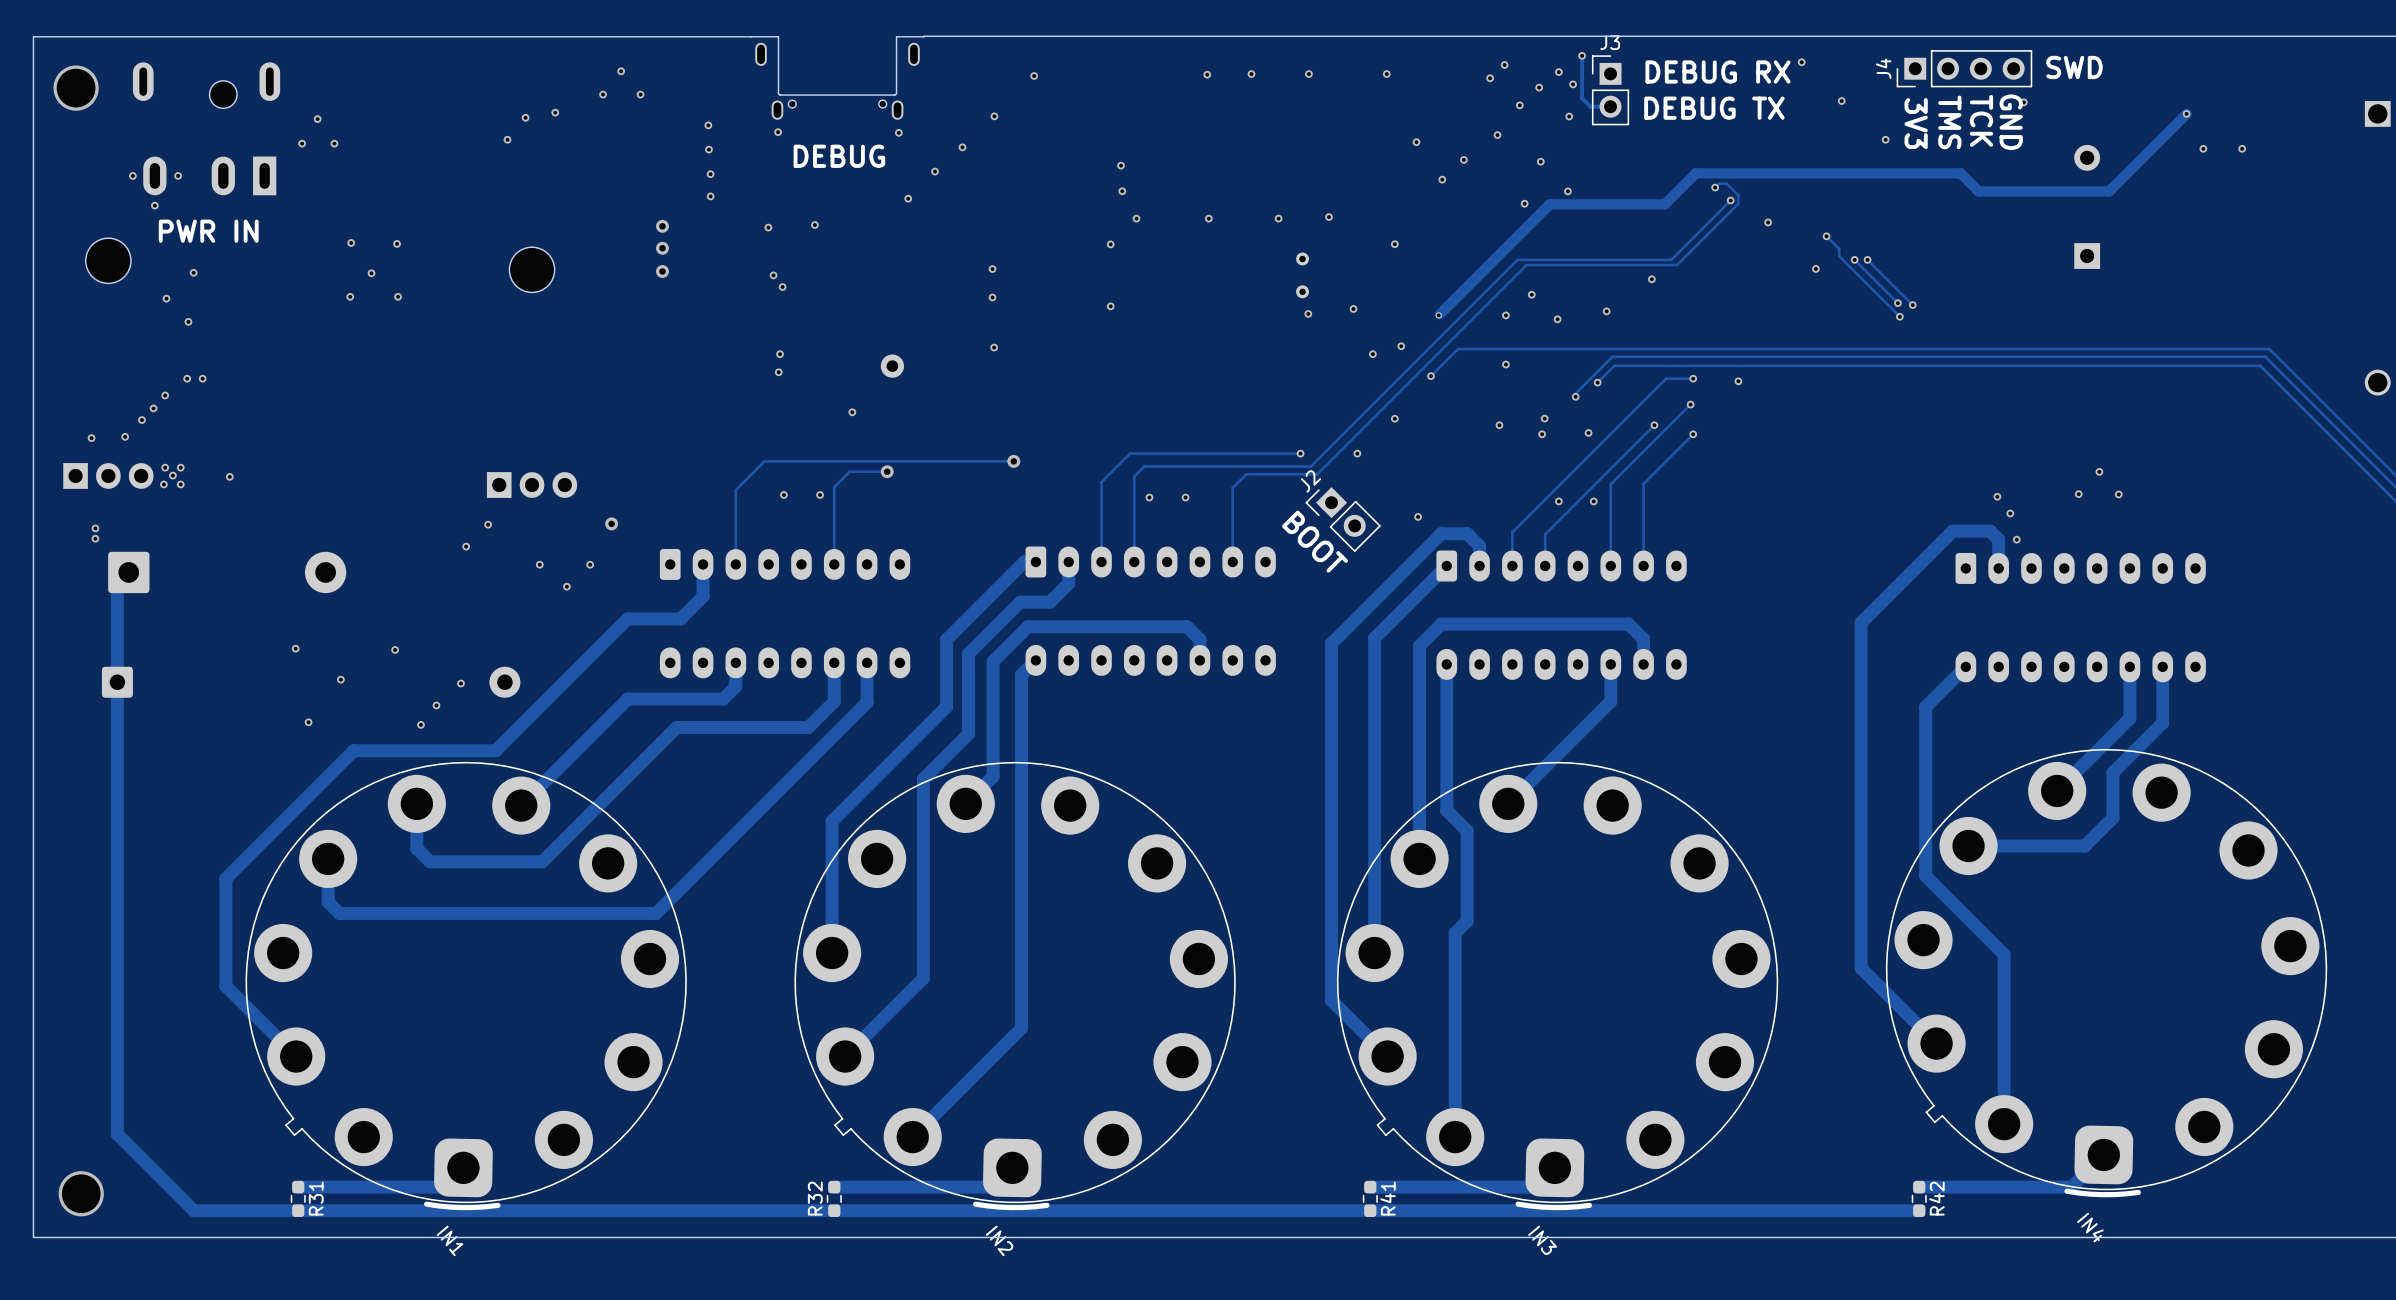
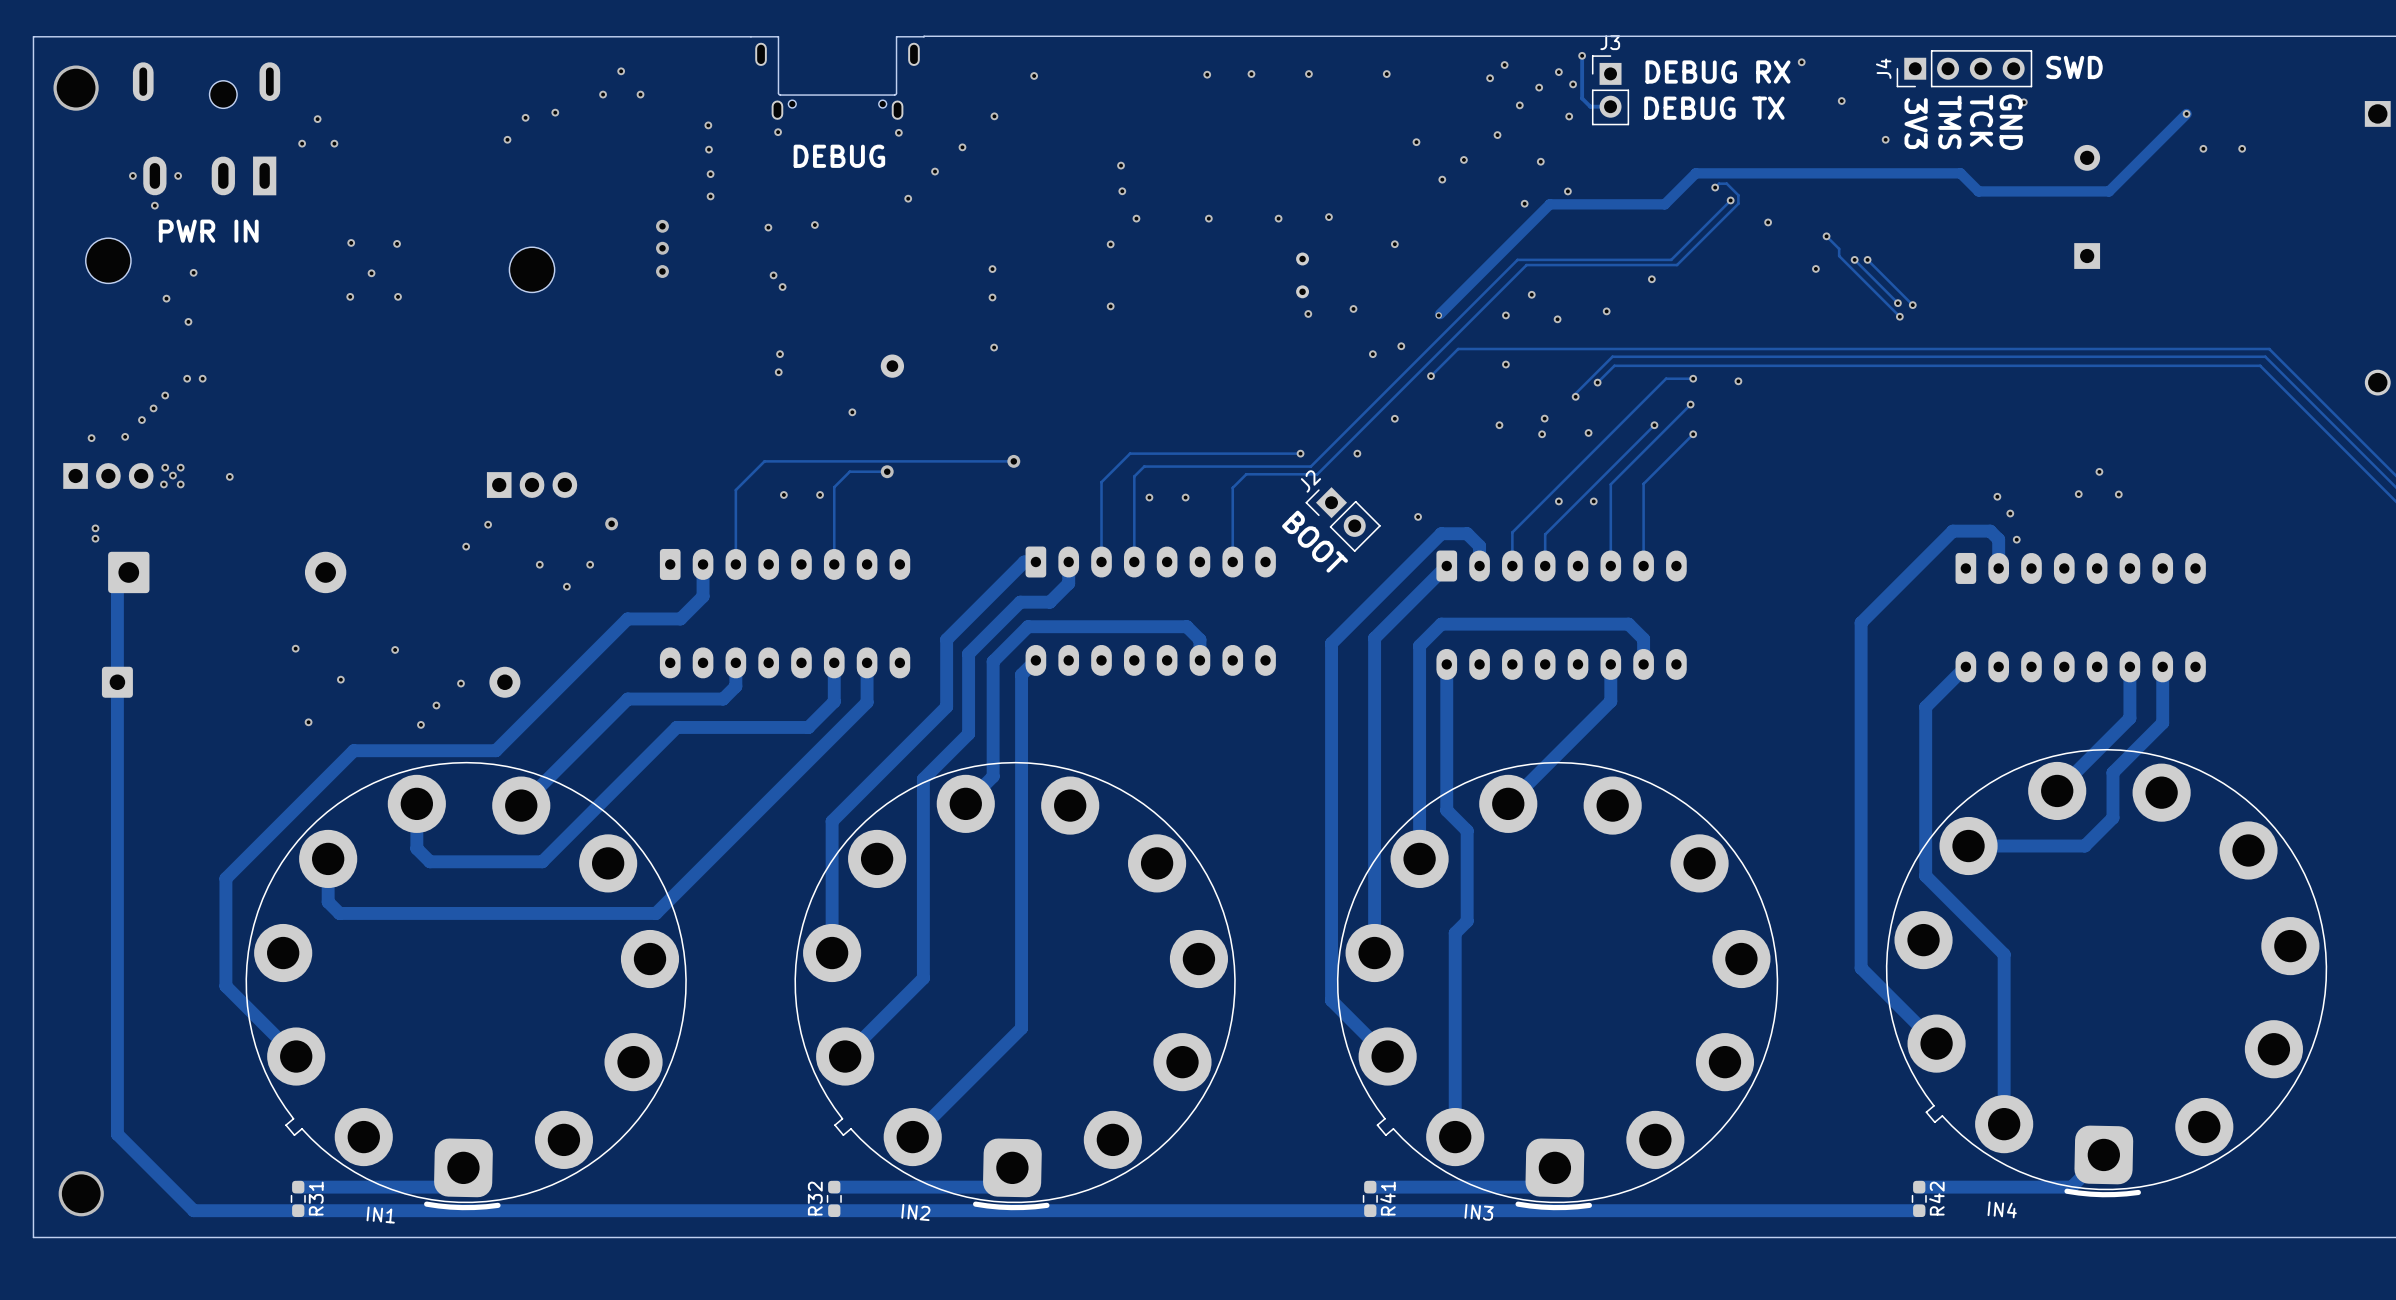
IN4 name rotation: 0° (2090, 1227) -> 45° counterclockwise (2002, 1209)
IN4 name position: IN4 (2090, 1227) -> IN4 (2002, 1209)
IN1 name rotation: 0° (450, 1240) -> 45° counterclockwise (380, 1215)
IN1 name position: IN1 (450, 1240) -> IN1 (380, 1215)
IN2 name rotation: 0° (999, 1240) -> 45° counterclockwise (915, 1212)
IN2 name position: IN2 (999, 1240) -> IN2 (915, 1212)
IN3 name rotation: 0° (1542, 1240) -> 45° counterclockwise (1479, 1212)
IN3 name position: IN3 (1542, 1240) -> IN3 (1479, 1212)

